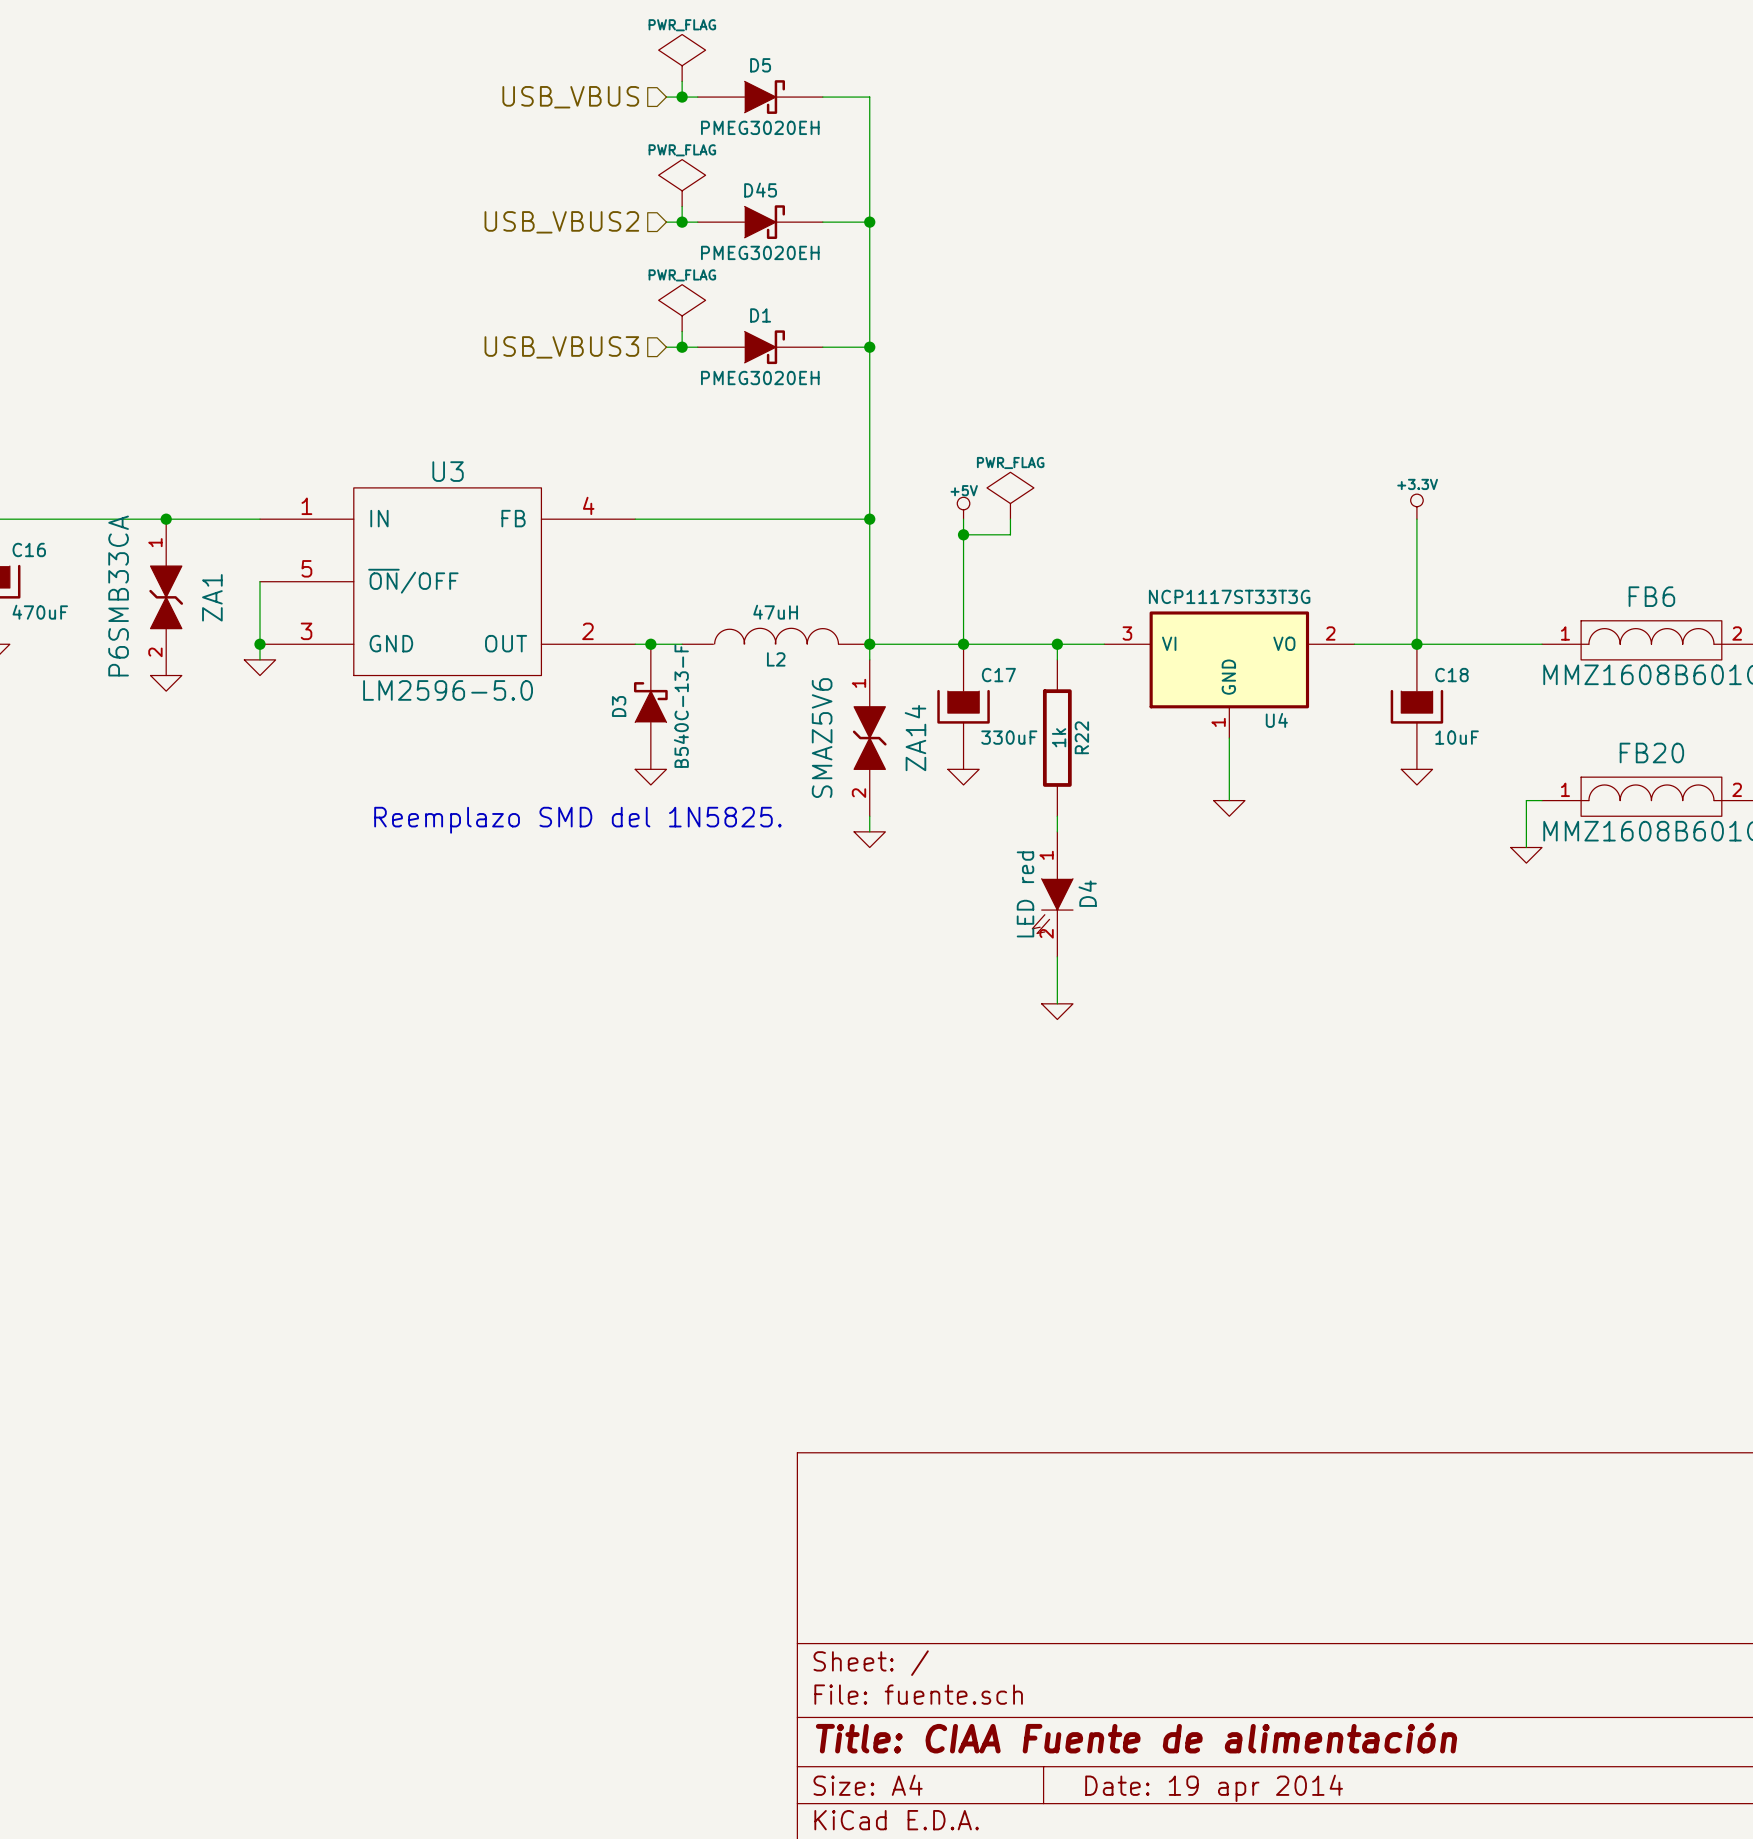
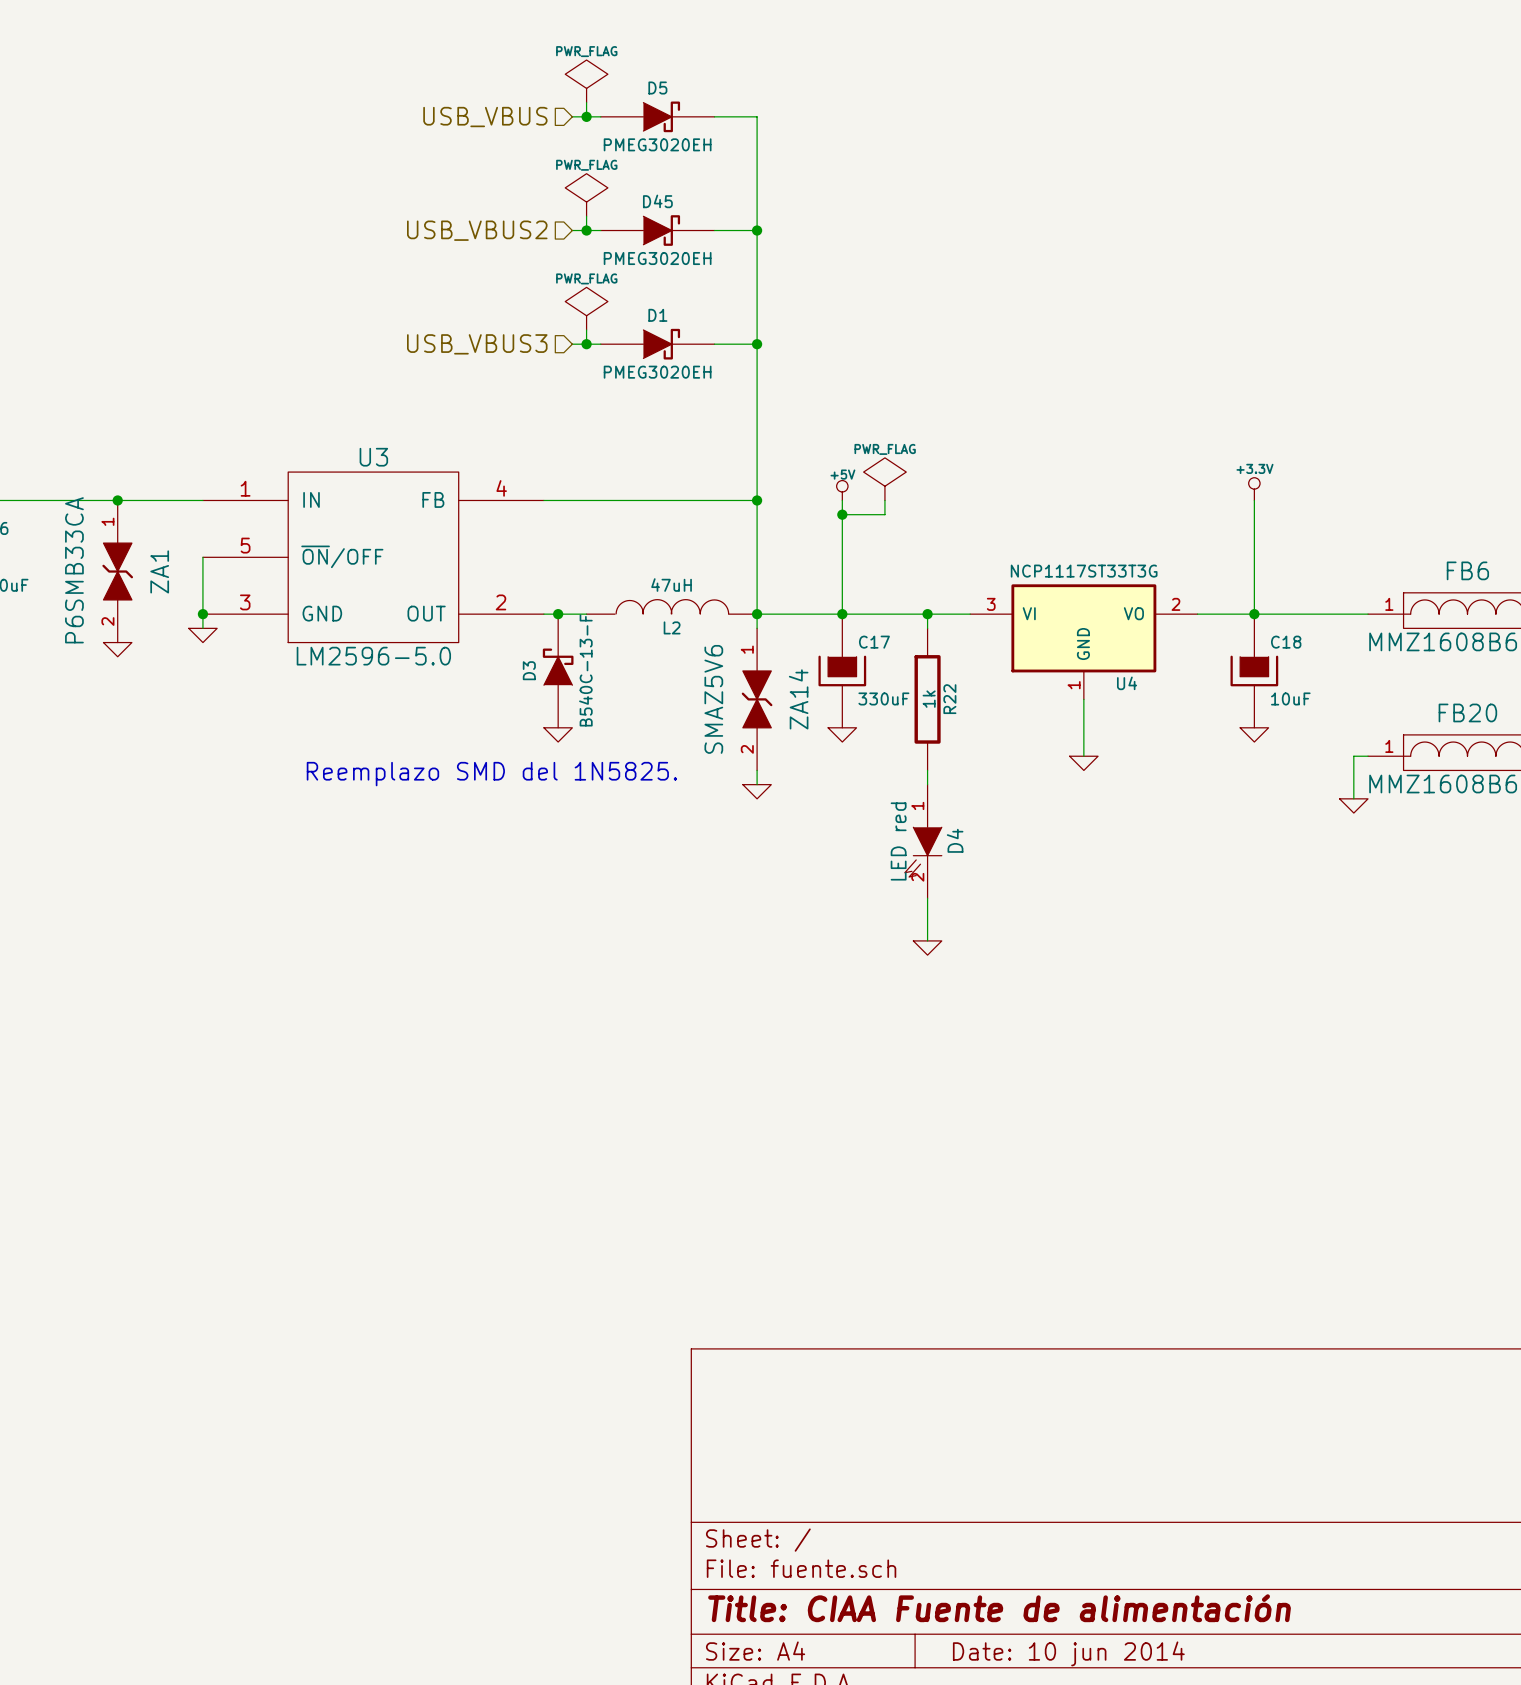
title block: Date: 19 apr 2014 (1214, 1788) -> Date: 10 jun 2014 (1068, 1653)

